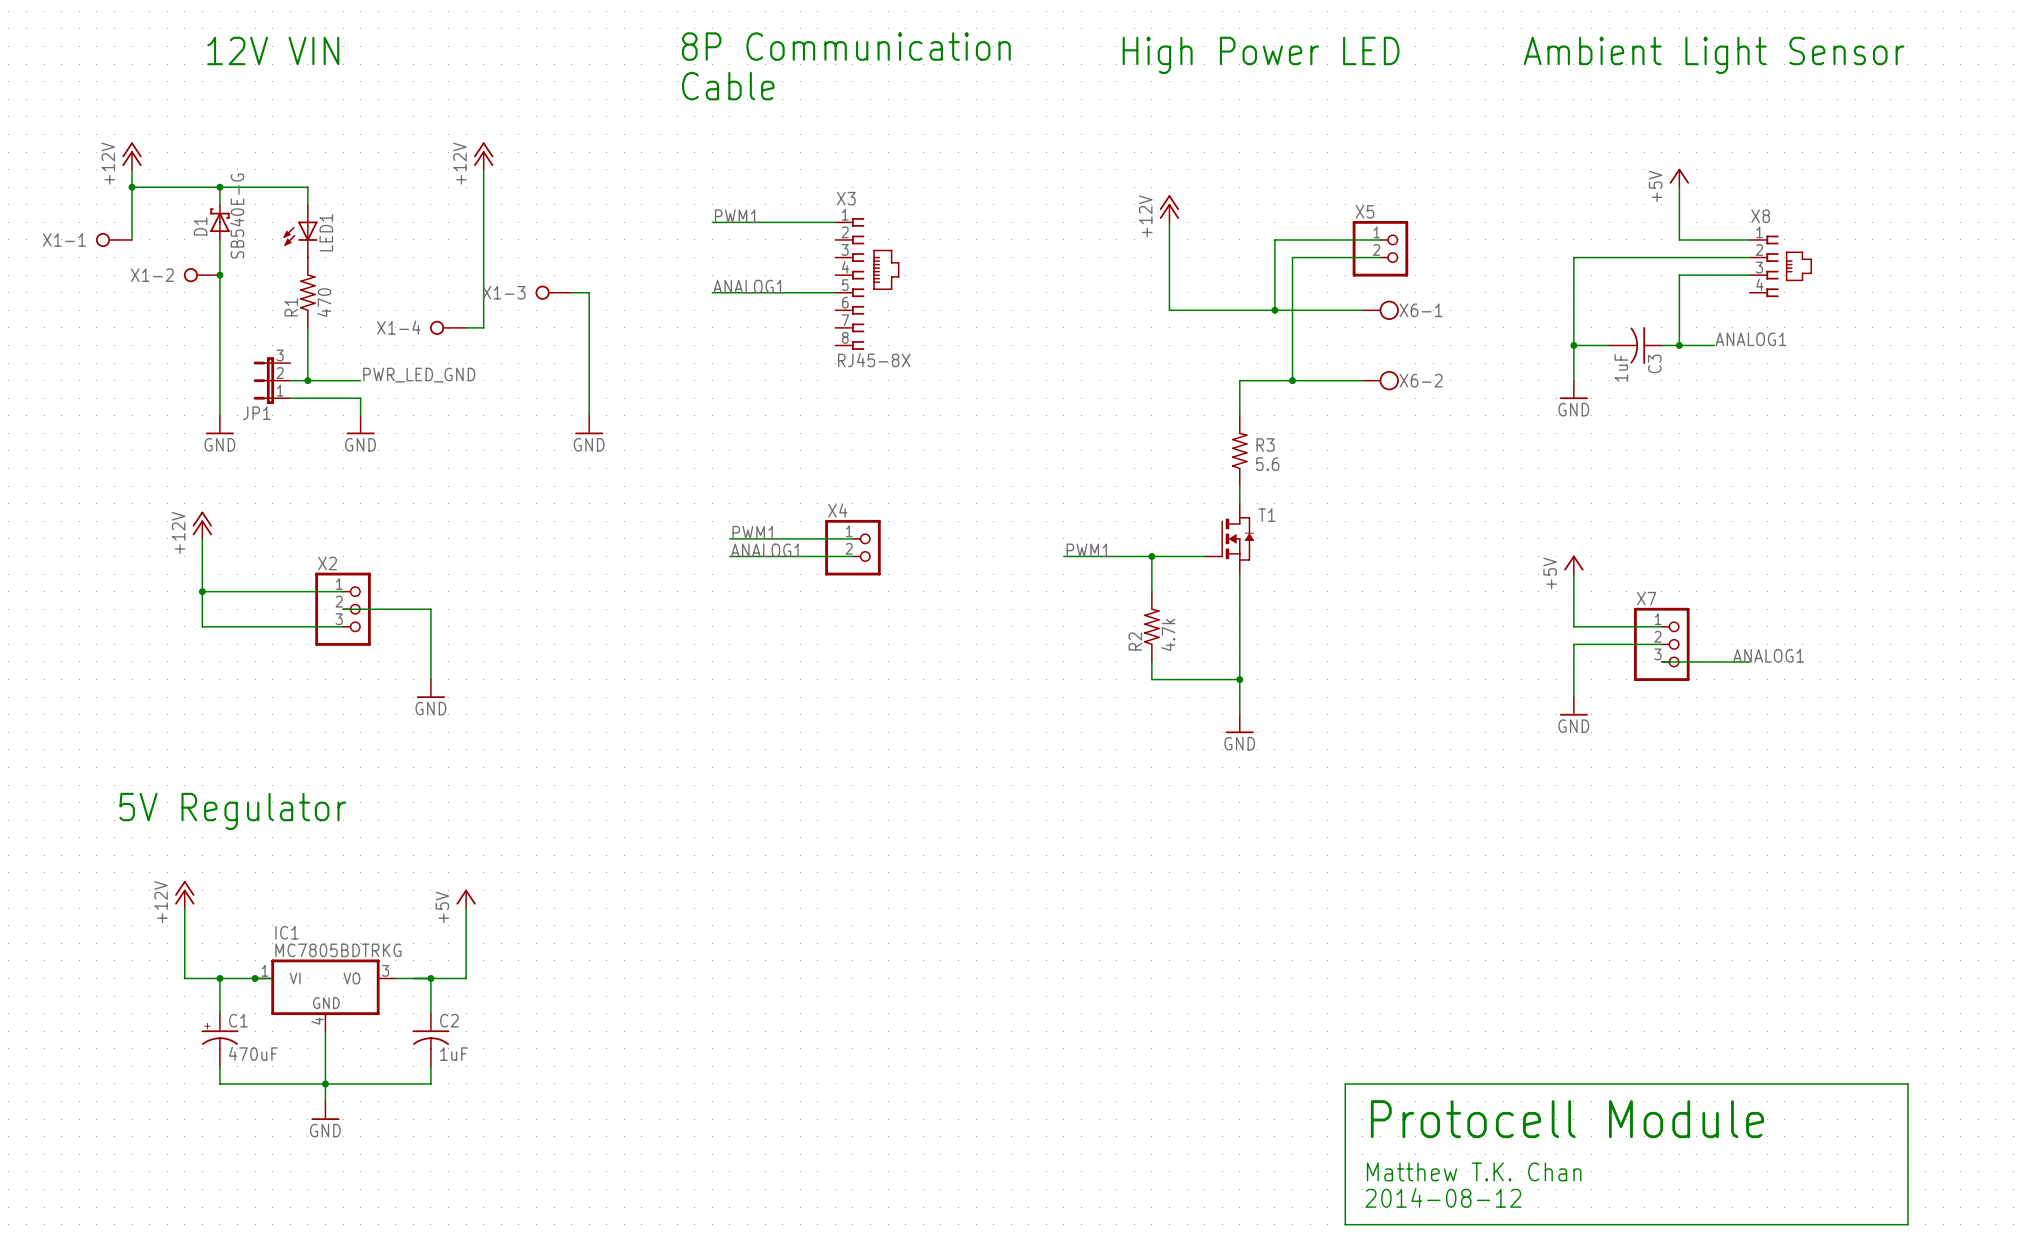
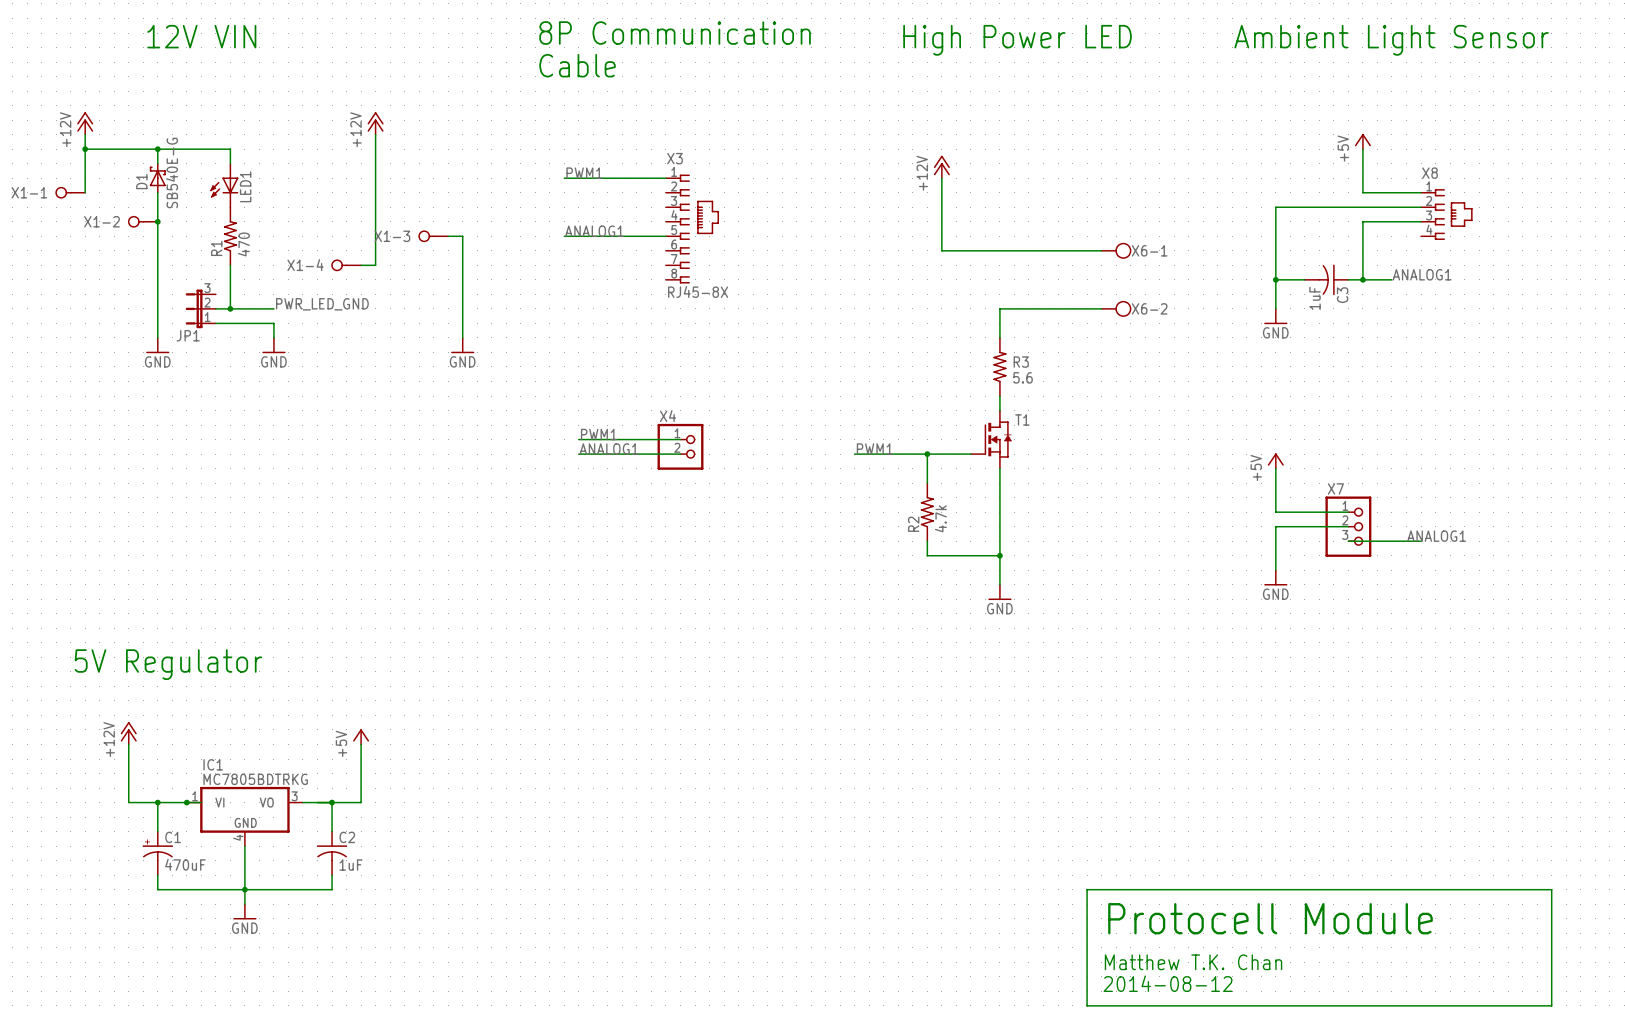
wire: (1380, 239) (1274, 239) (1274, 310) -> none
X5: (1380, 248) -> none
wire: (1380, 257) (1292, 257) (1292, 380) -> none
junction: (1274, 310) -> none
junction: (1292, 380) -> none
power symbol: +12V (202, 525) -> none
wire: (202, 538) (202, 626) (343, 626) -> none
wire: (202, 591) (343, 591) -> none
junction: (202, 591) -> none
wire: (343, 609) (430, 609) (430, 679) -> none
X2: (343, 609) -> none
power symbol: GND (430, 688) -> none

